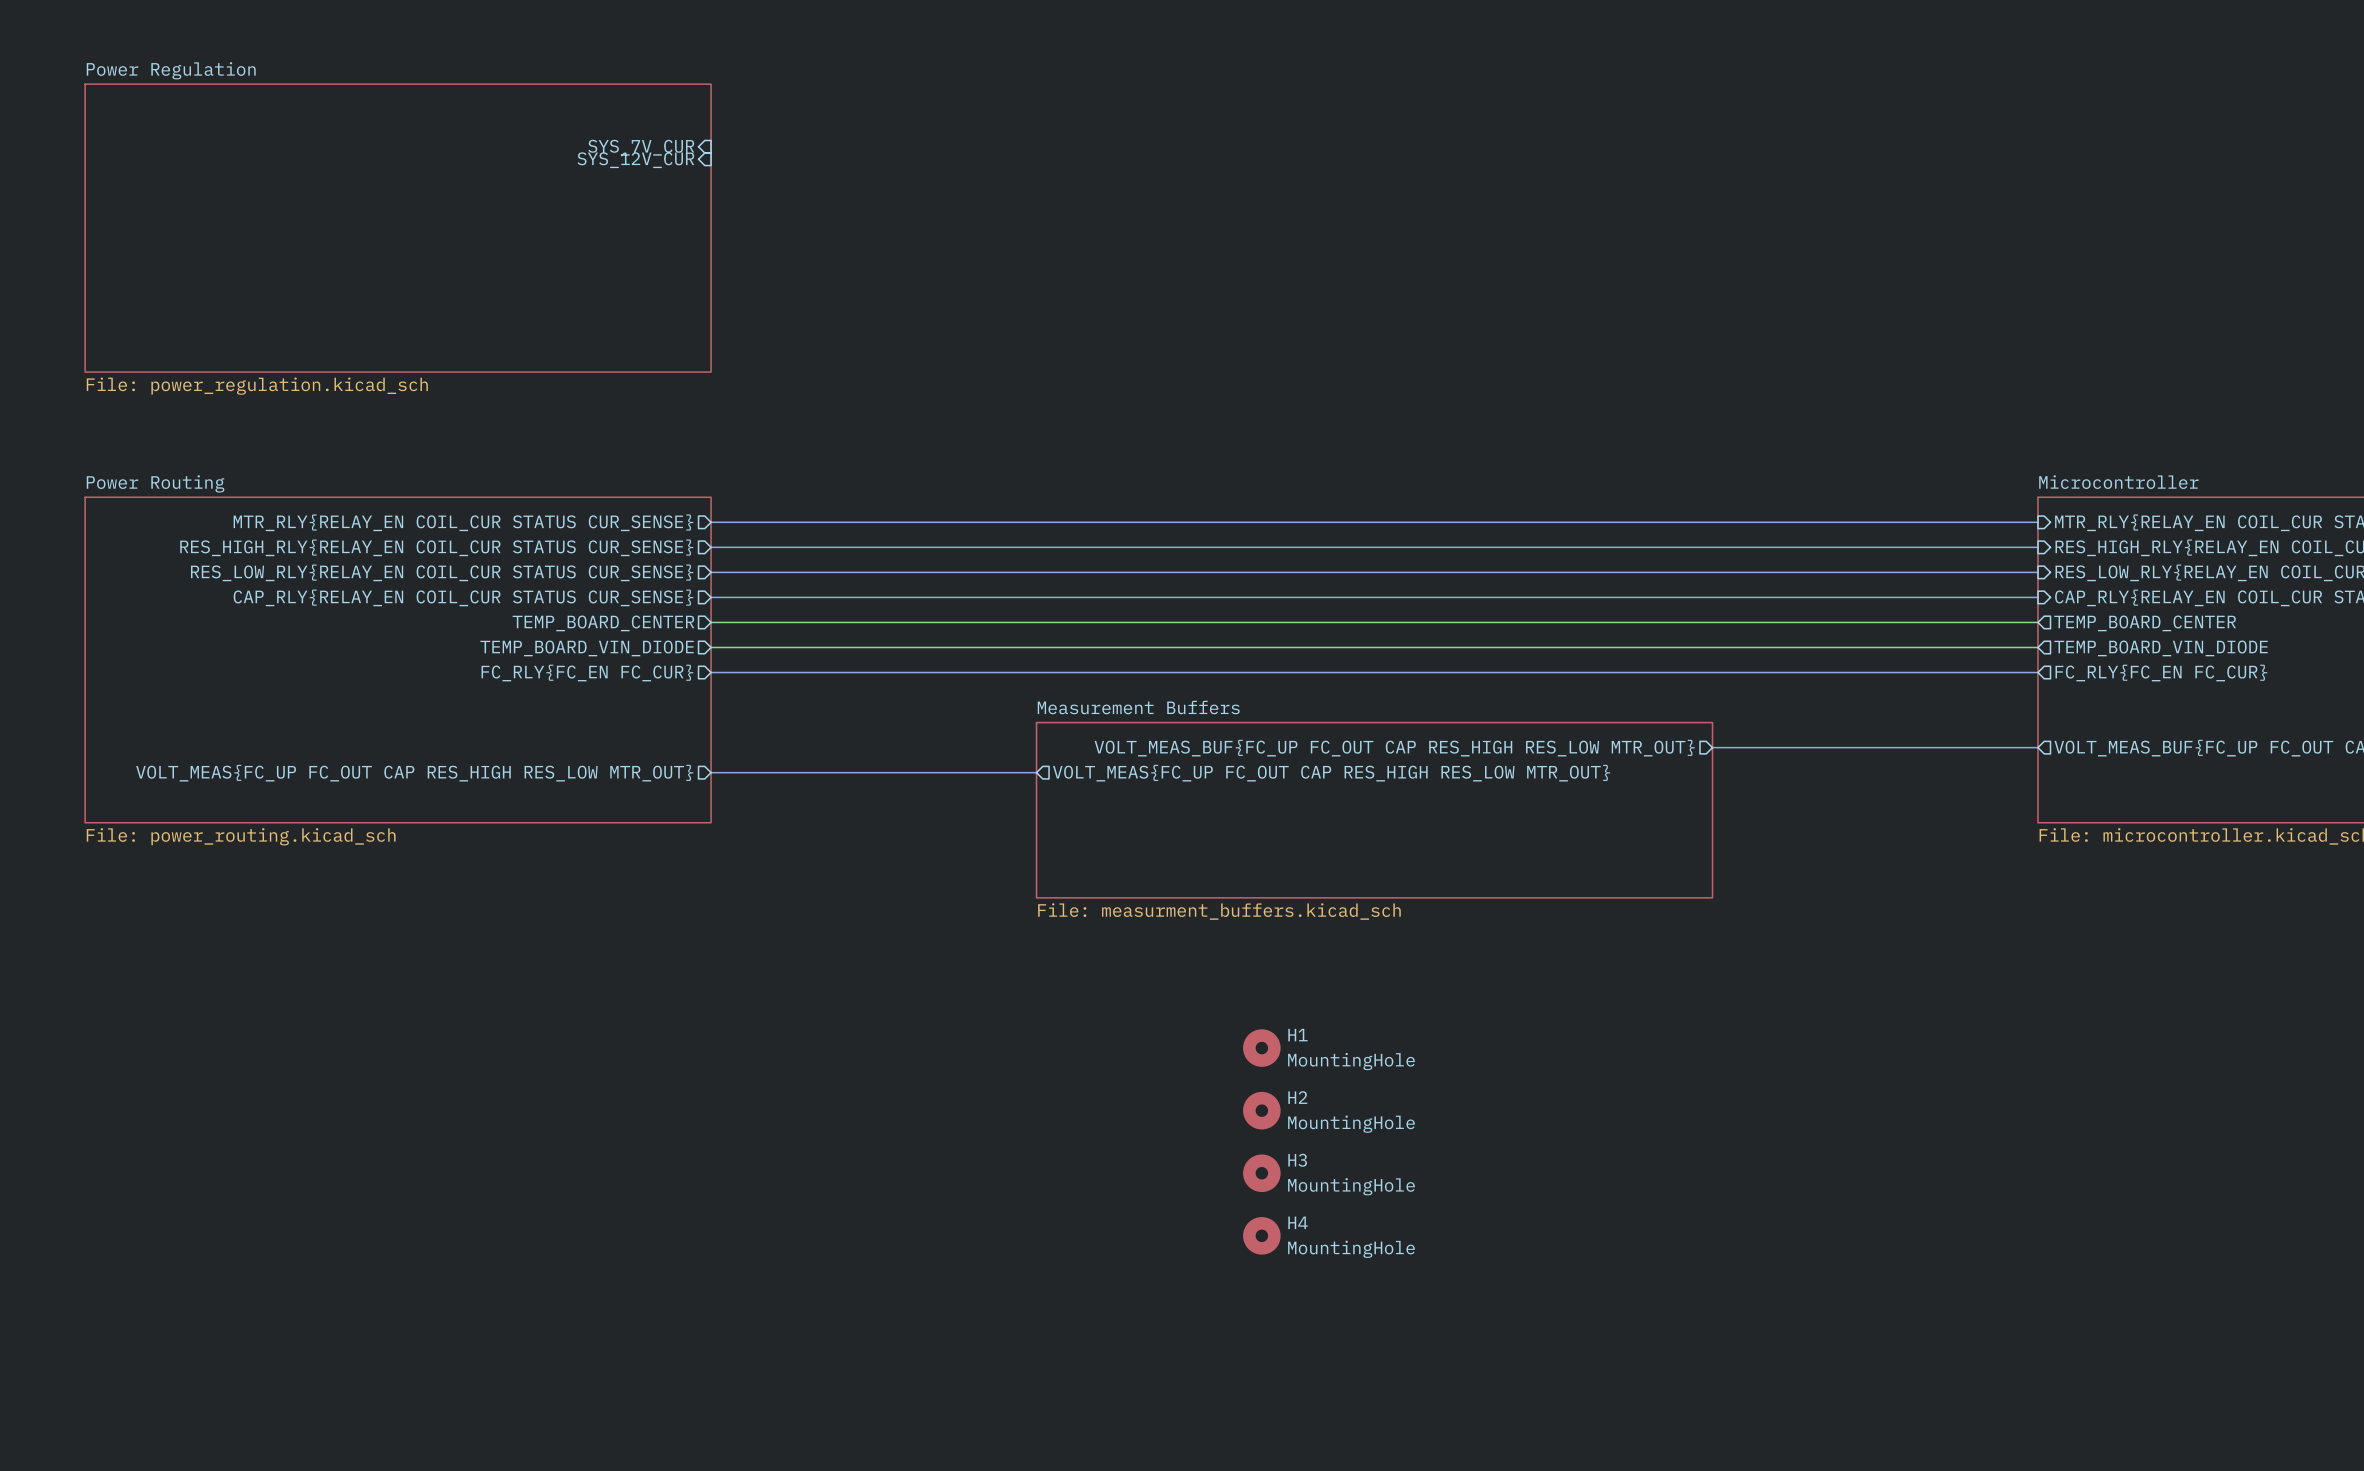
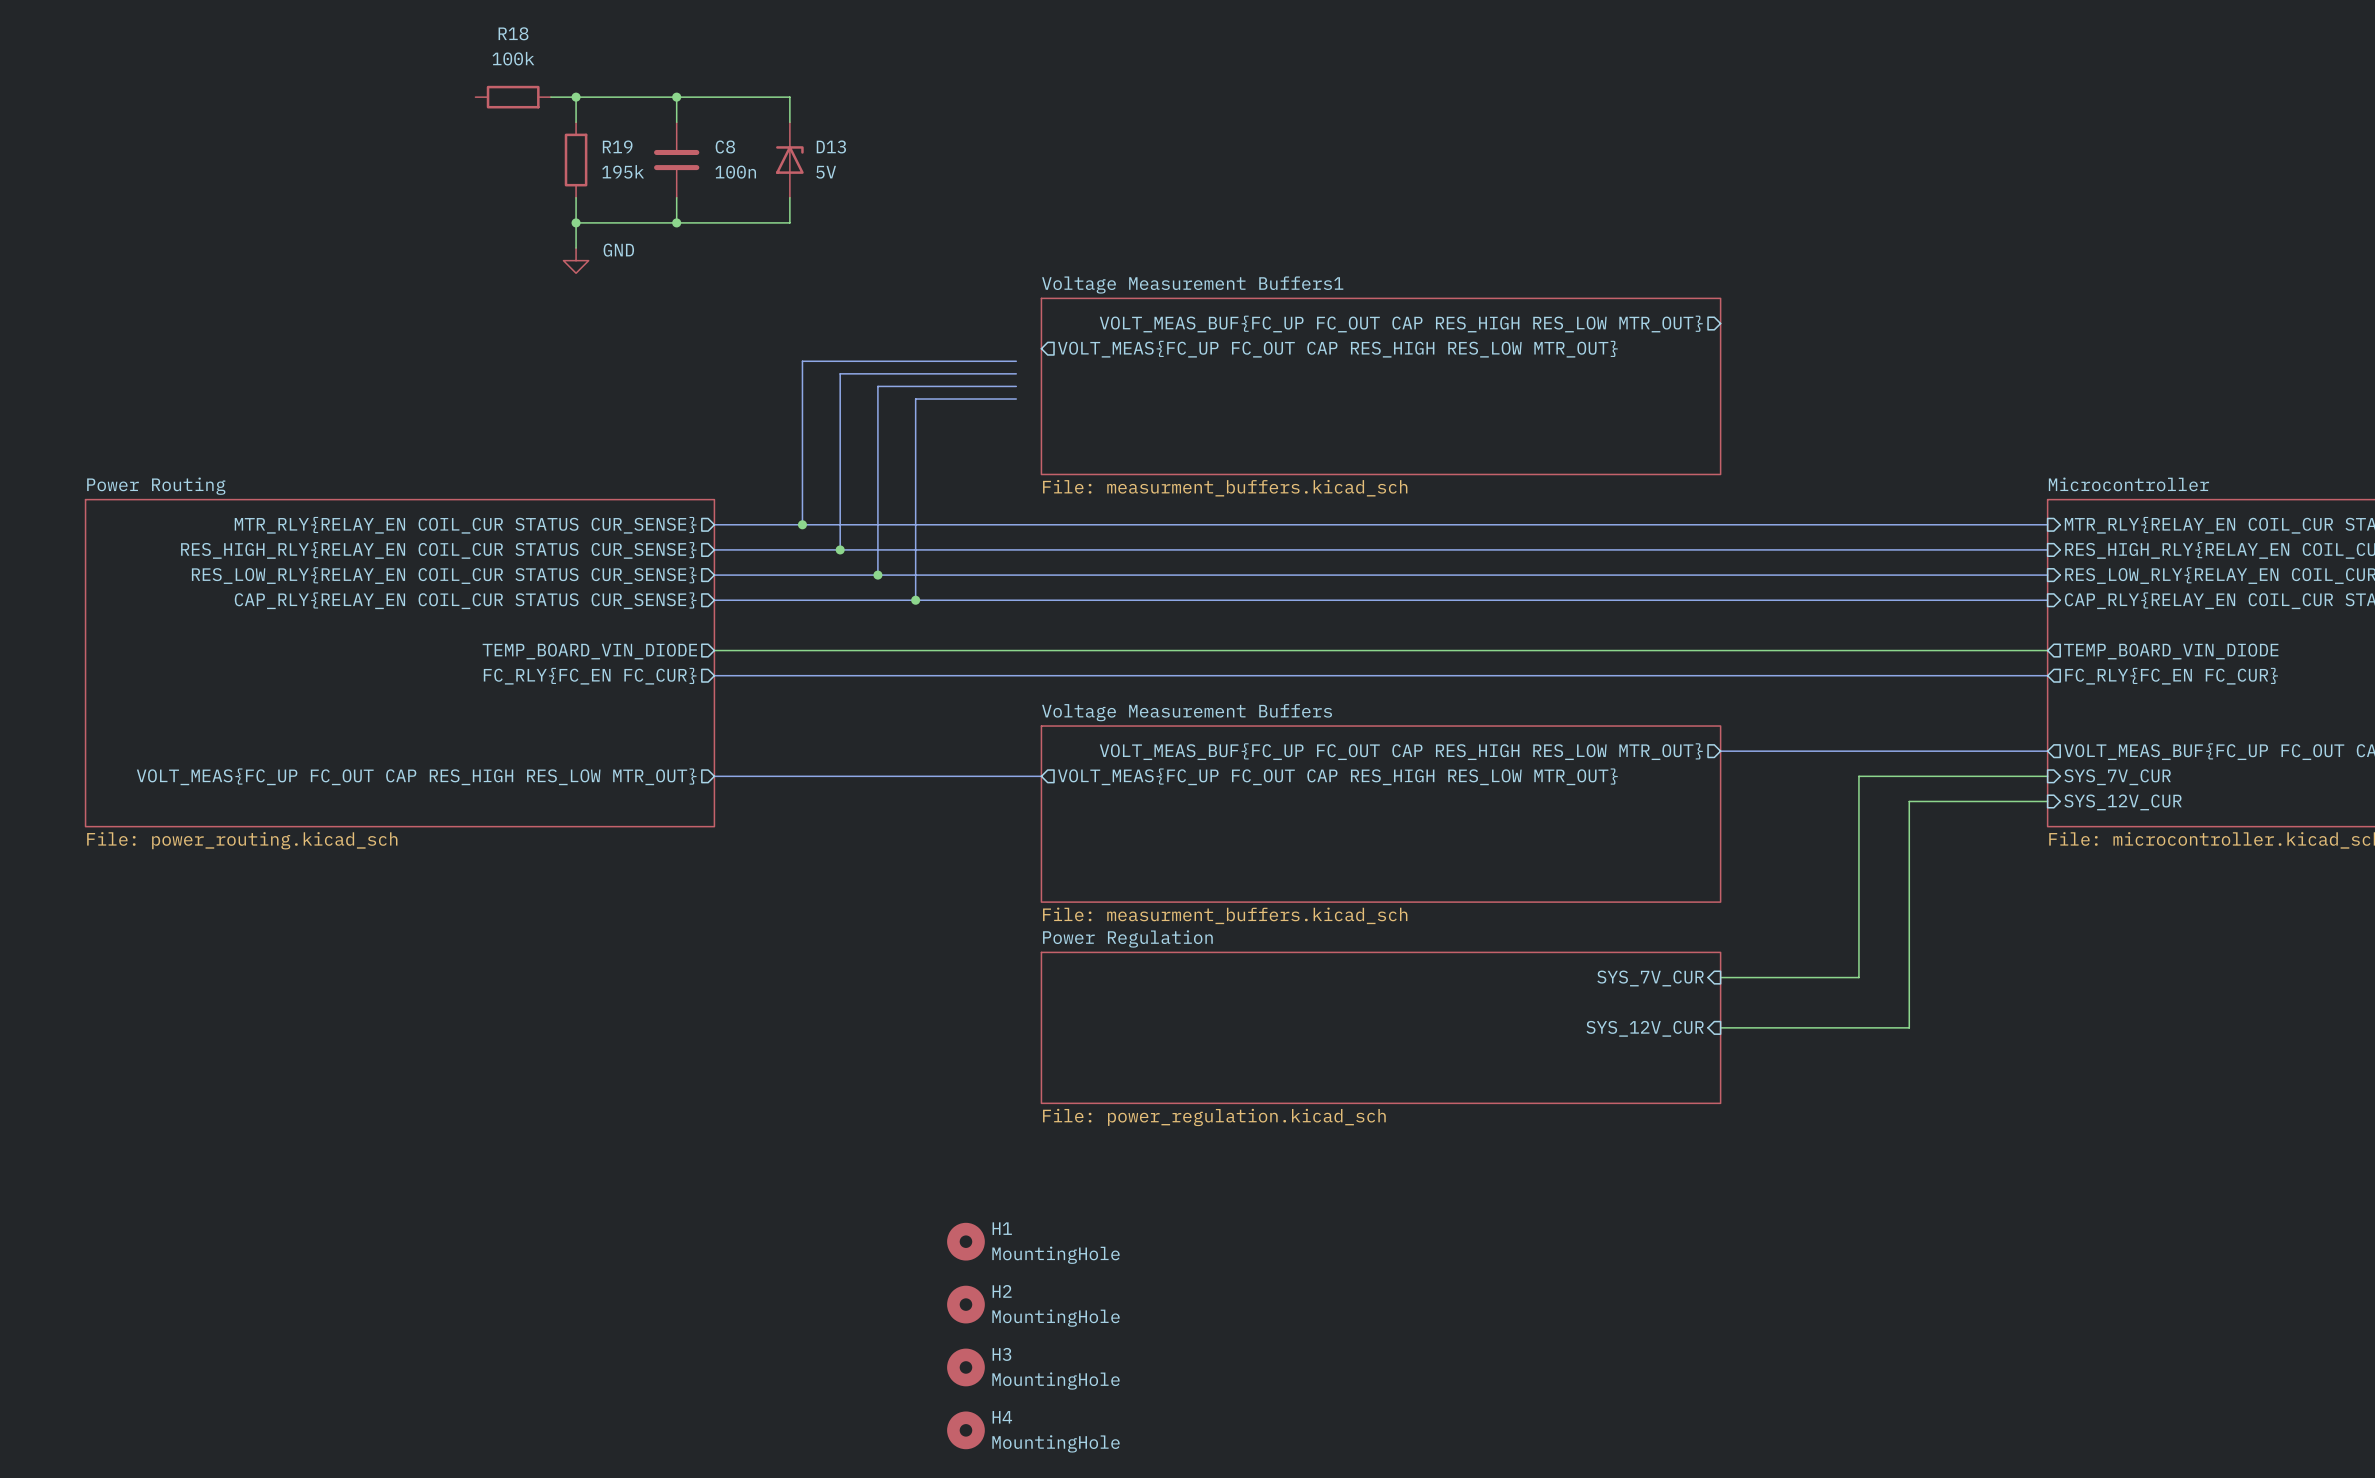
R18: none -> 100k (513, 97)
wire: none -> (550, 97) (789, 97) (789, 122)
wire: none -> (576, 97) (576, 122)
junction: none -> (576, 97)
wire: none -> (676, 97) (676, 122)
junction: none -> (676, 97)
sheet pin: SYS_7V_CUR (641, 147) -> none
R19: none -> 195k (576, 160)
C8: none -> 100n (676, 160)
D13: none -> 5V (789, 160)
sheet pin: SYS_12V_CUR (635, 160) -> none
wire: none -> (576, 197) (576, 248)
wire: none -> (676, 197) (676, 222)
wire: none -> (789, 197) (789, 222) (576, 222)
junction: none -> (576, 222)
junction: none -> (676, 222)
sheet Power Regulation: File: power_regulation.kicad_sch (398, 228) -> none
power symbol: none -> GND (576, 260)
sheet pin: none -> VOLT_MEAS_BUF{FC_UP FC_OUT CAP RES_HIGH RES_LOW MTR_OUT} (1401, 324)
sheet pin: none -> VOLT_MEAS{FC_UP FC_OUT CAP RES_HIGH RES_LOW MTR_OUT} (1337, 349)
bus: none -> (1016, 361) (802, 361) (802, 524)
bus: none -> (1016, 373) (840, 373) (840, 549)
bus: none -> (1016, 386) (877, 386) (877, 575)
sheet Voltage Measurement Buffers1: none -> File: measurment_buffers.kicad_sch (1381, 386)
bus: none -> (1016, 399) (915, 399) (915, 600)
junction: none -> (802, 524)
junction: none -> (840, 549)
junction: none -> (877, 575)
junction: none -> (915, 600)
wire: (711, 622) (2037, 622) -> none
sheet pin: TEMP_BOARD_CENTER (603, 623) -> none
sheet pin: TEMP_BOARD_CENTER (2145, 623) -> none
sheet Measurement Buffers name: Measurement Buffers (1138, 707) -> Voltage Measurement Buffers (1187, 712)
wire: none -> (2047, 776) (1858, 776) (1858, 977) (1720, 977)
sheet pin: none -> SYS_7V_CUR (2117, 777)
wire: none -> (2047, 801) (1909, 801) (1909, 1027) (1720, 1027)
sheet pin: none -> SYS_12V_CUR (2123, 802)
sheet pin: none -> SYS_7V_CUR (1650, 978)
sheet Power Regulation: none -> File: power_regulation.kicad_sch (1381, 1027)
sheet pin: none -> SYS_12V_CUR (1645, 1028)
H1 position: (1261, 1048) -> (965, 1241)
H2 position: (1261, 1110) -> (965, 1304)
H3 position: (1261, 1173) -> (965, 1367)
H4 position: (1261, 1235) -> (965, 1430)

